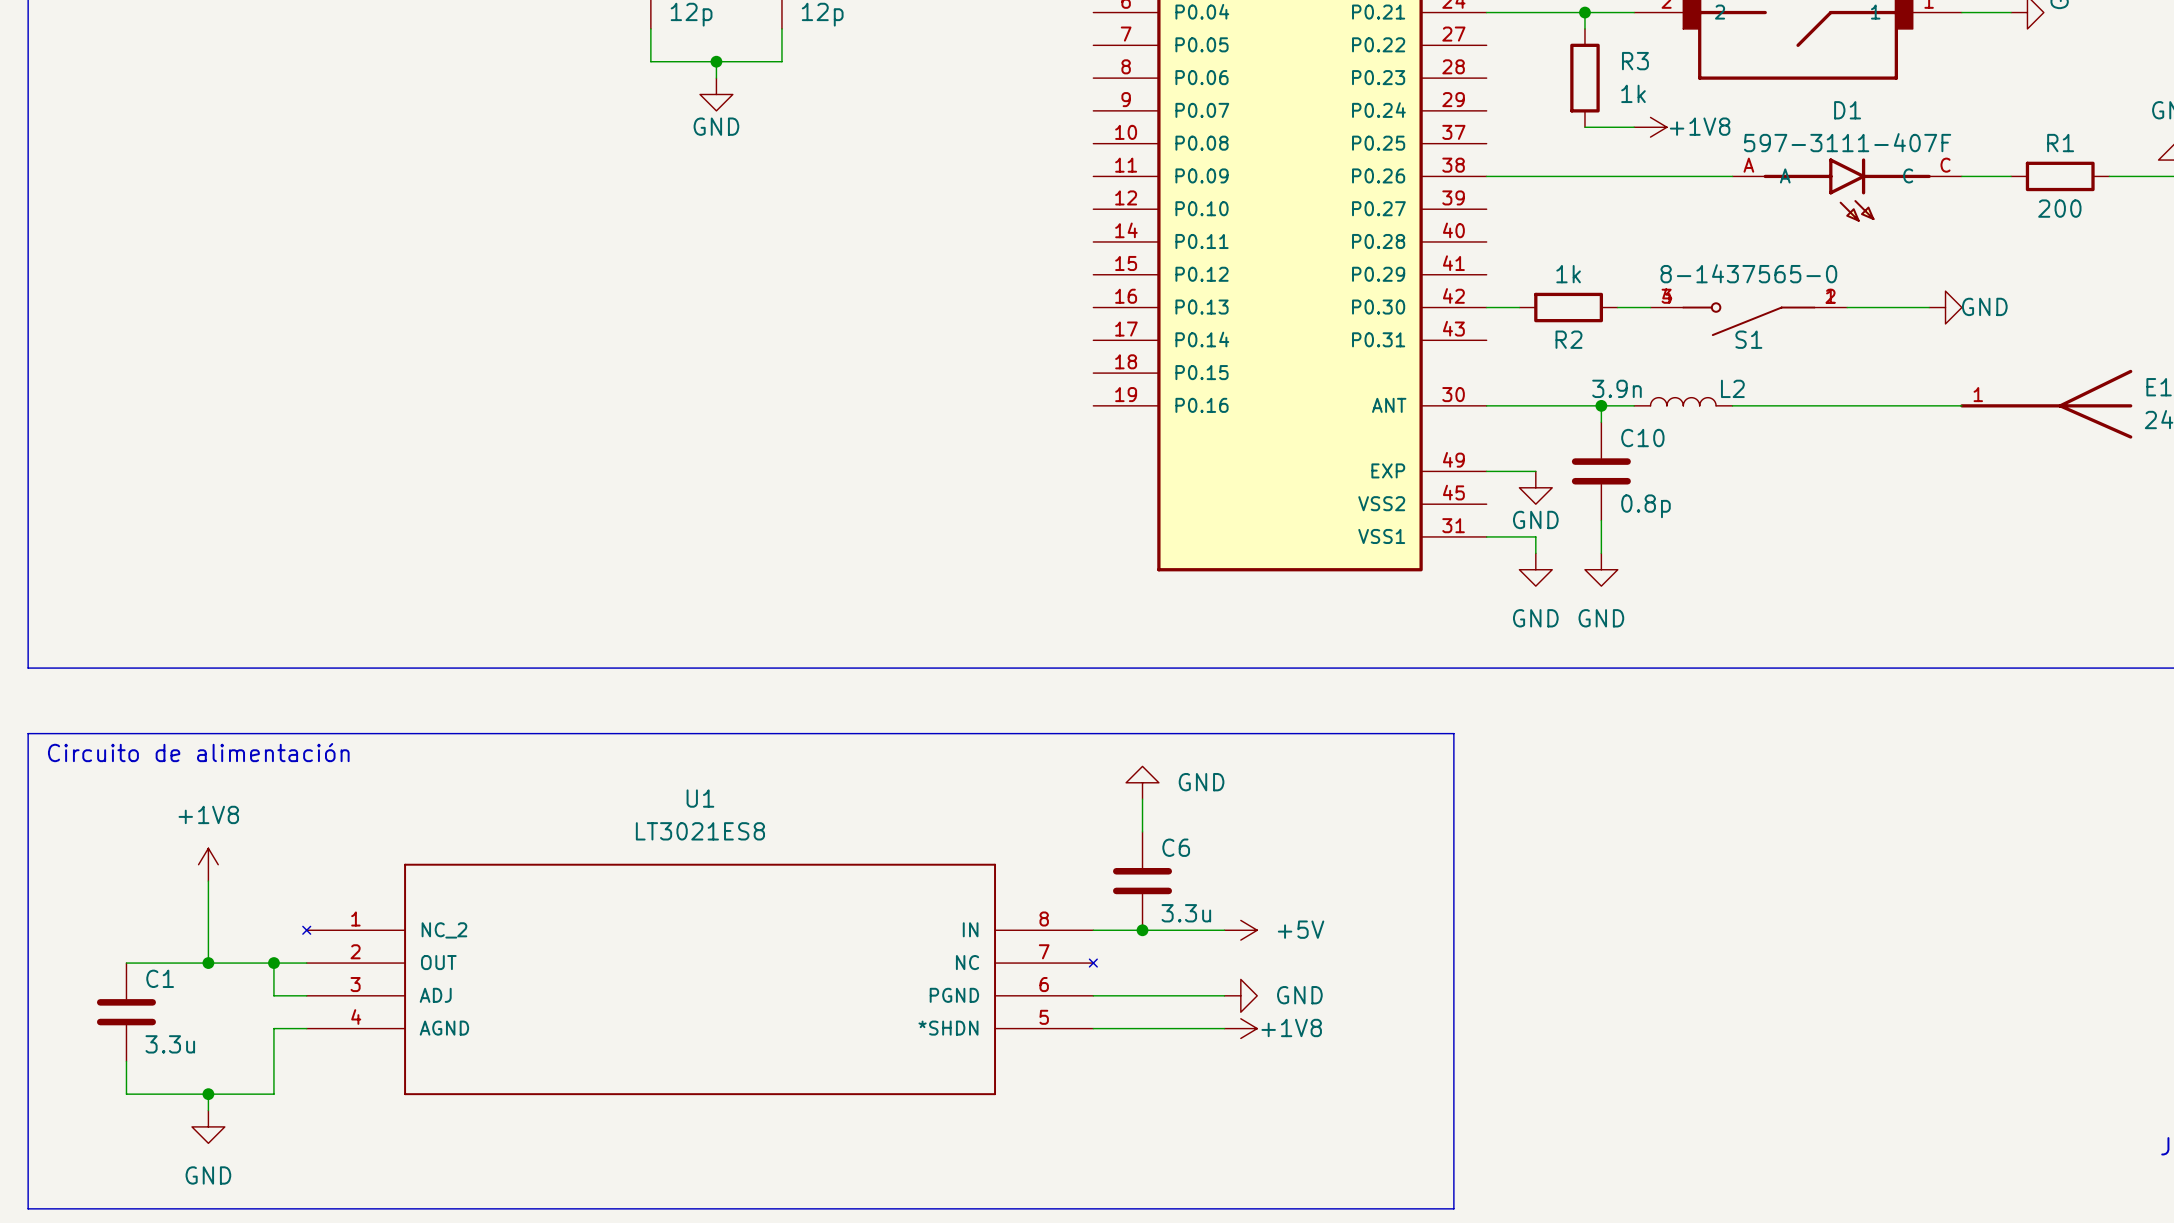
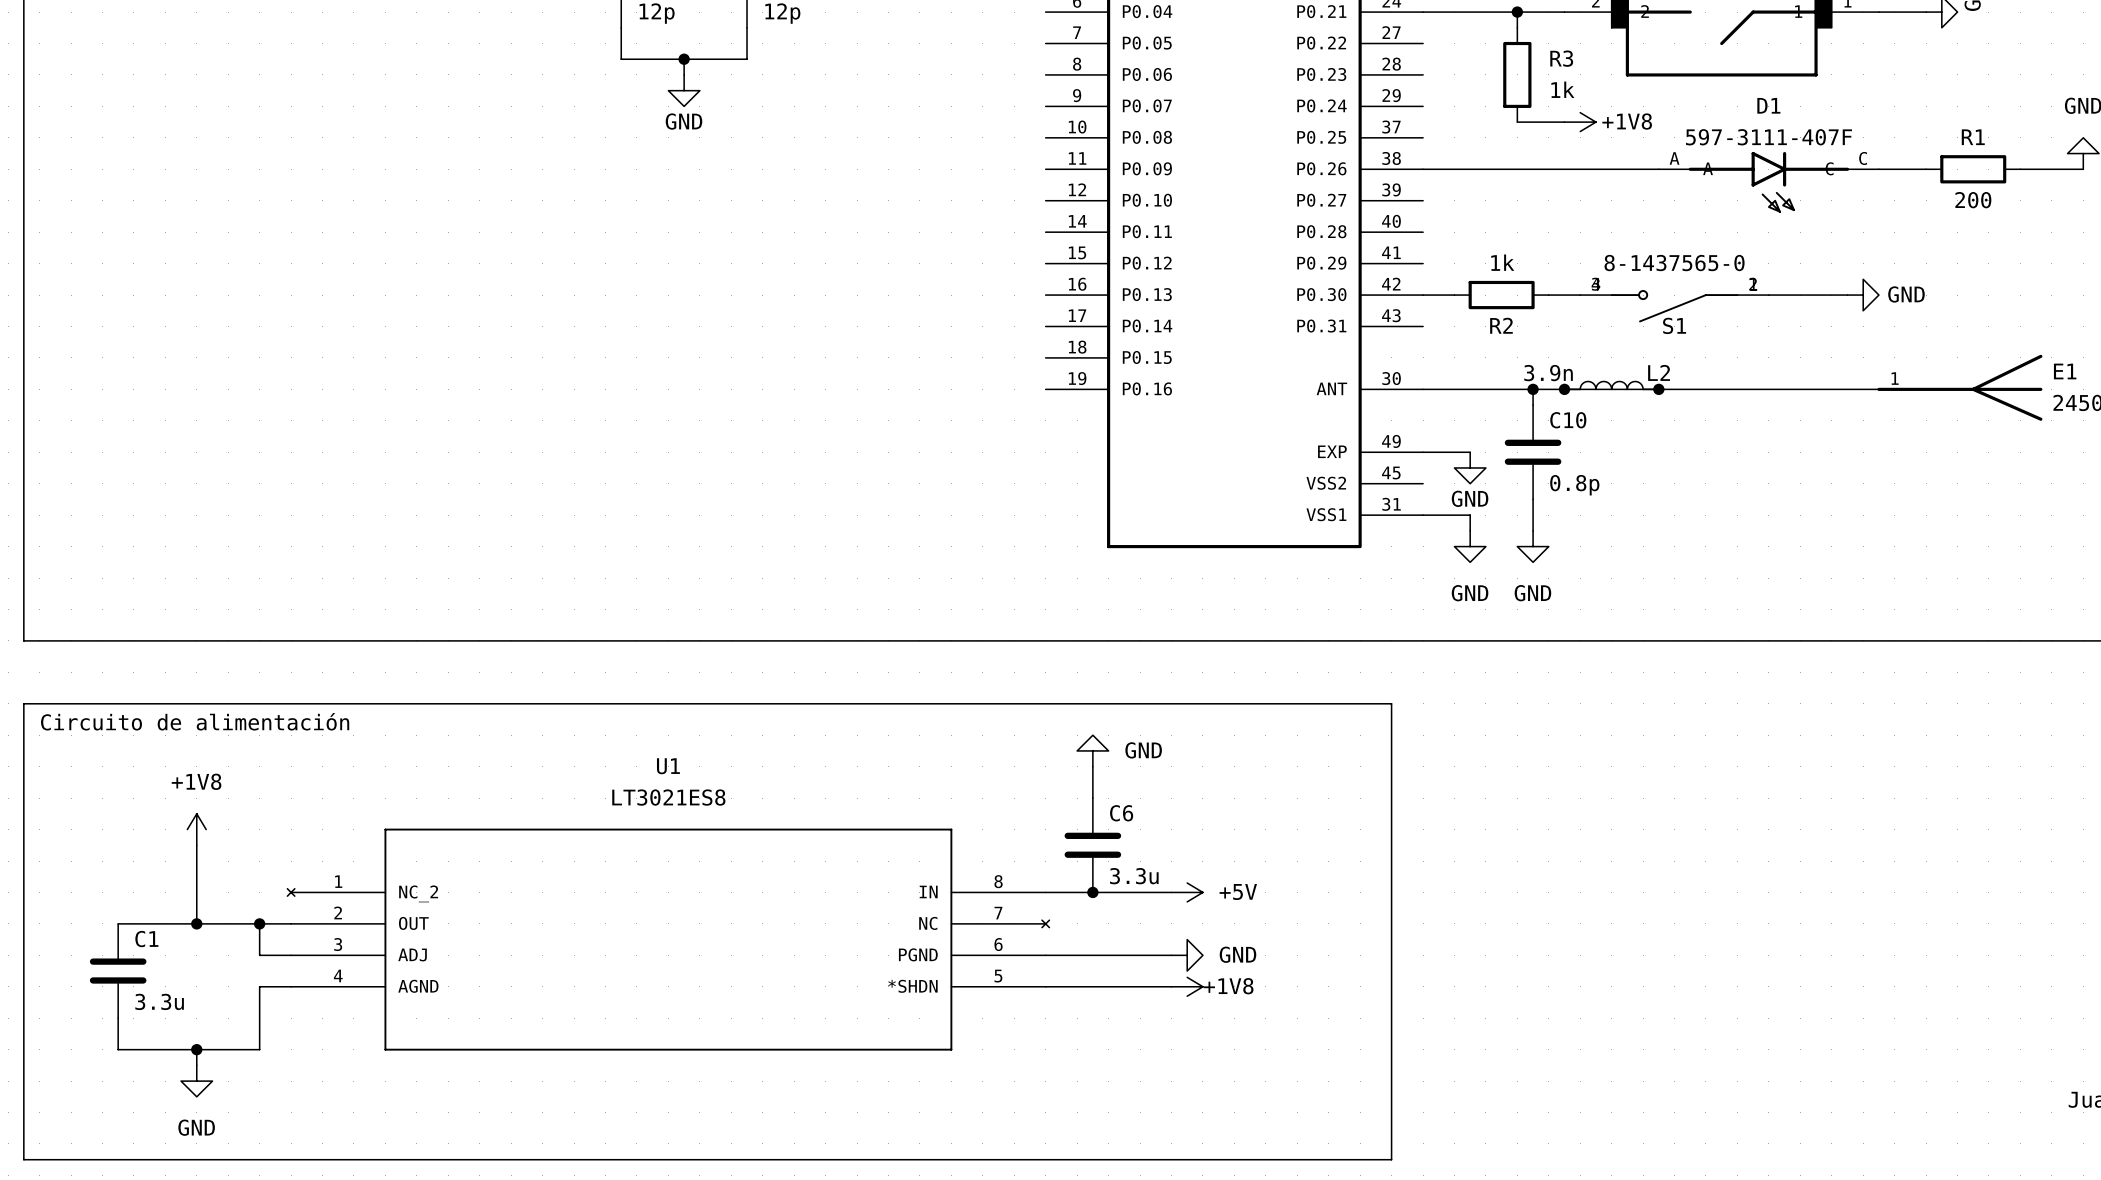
wire: none -> (1564, 389) (1658, 389)
junction: none -> (1564, 389)
junction: none -> (1658, 389)

